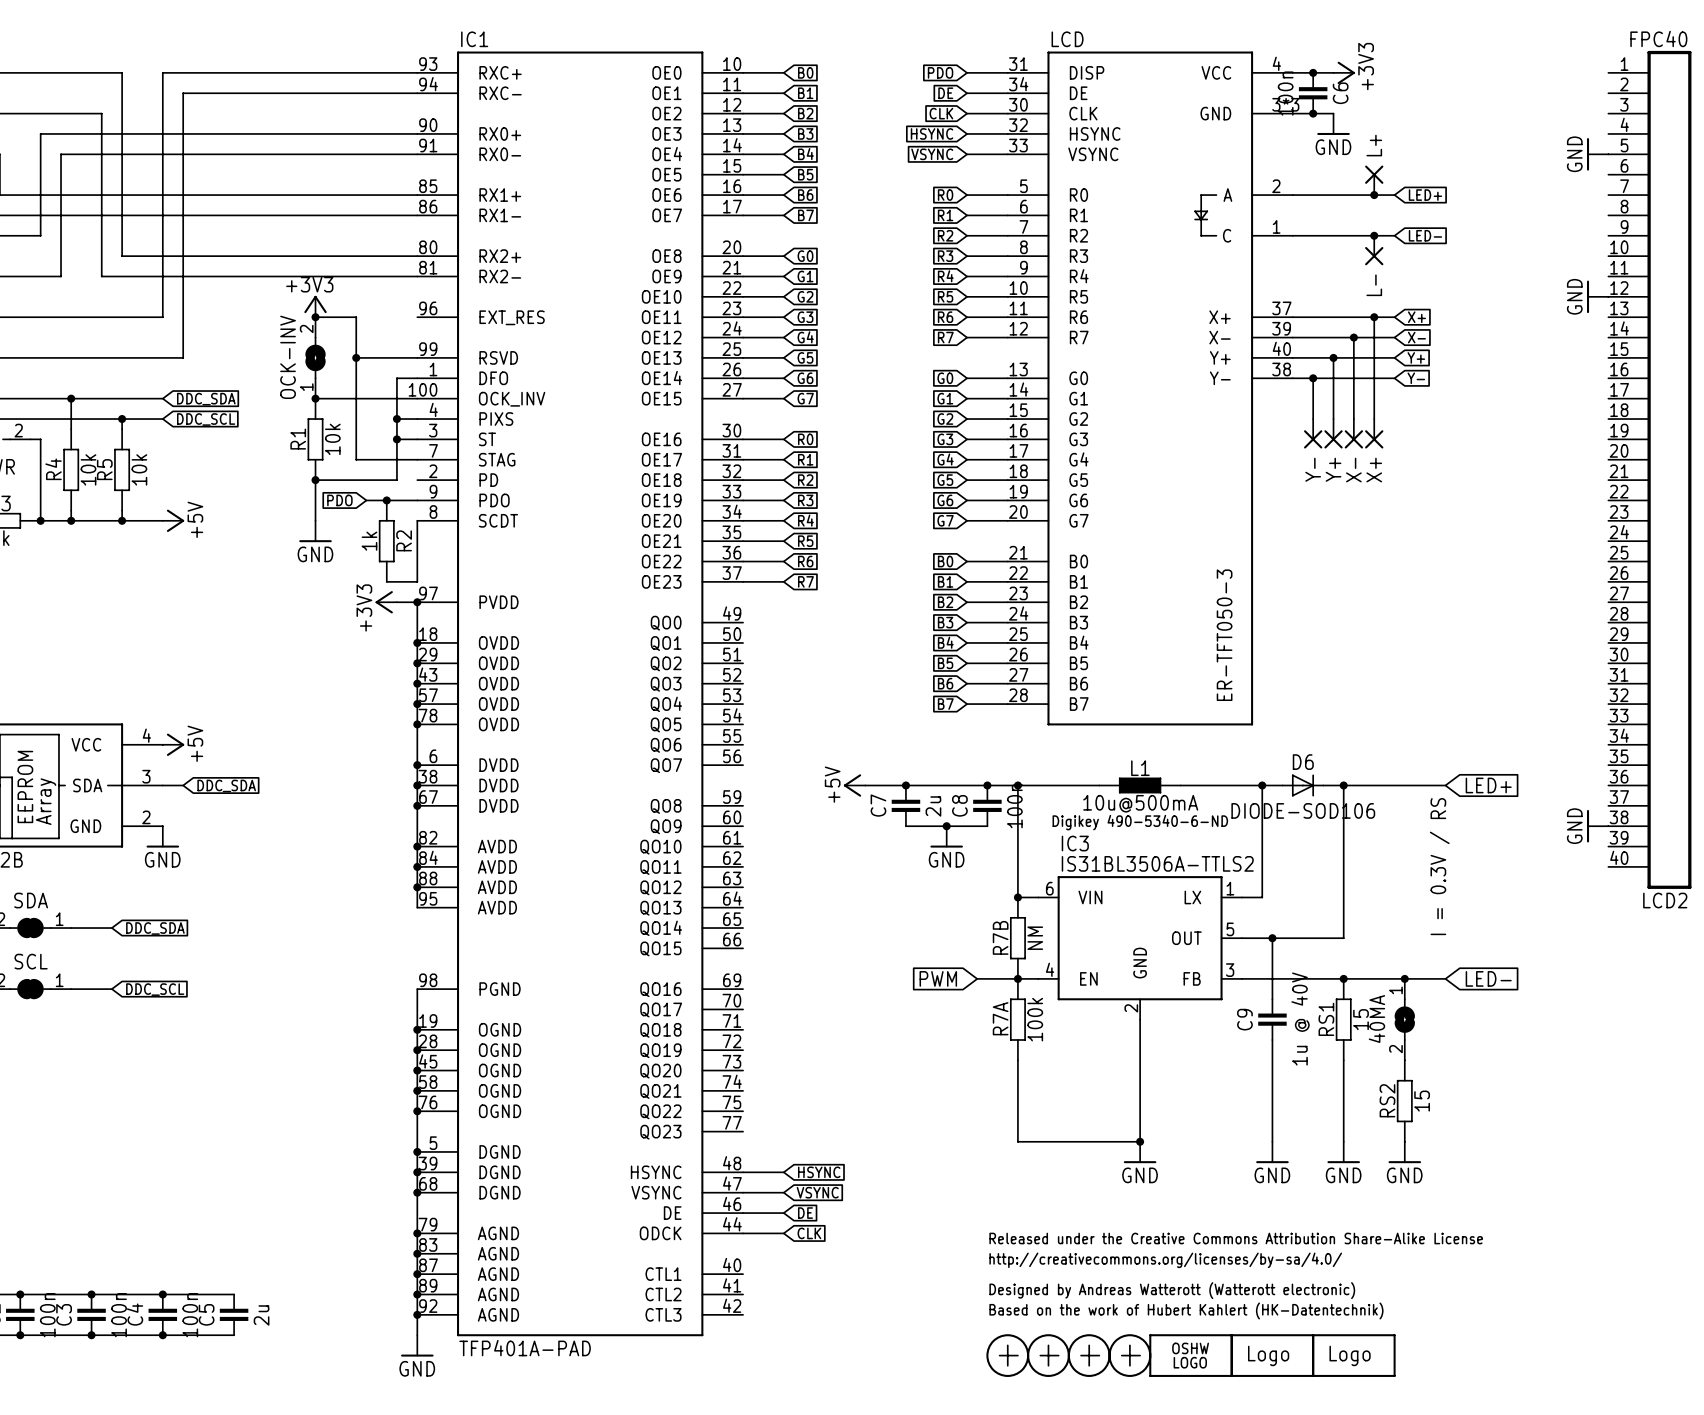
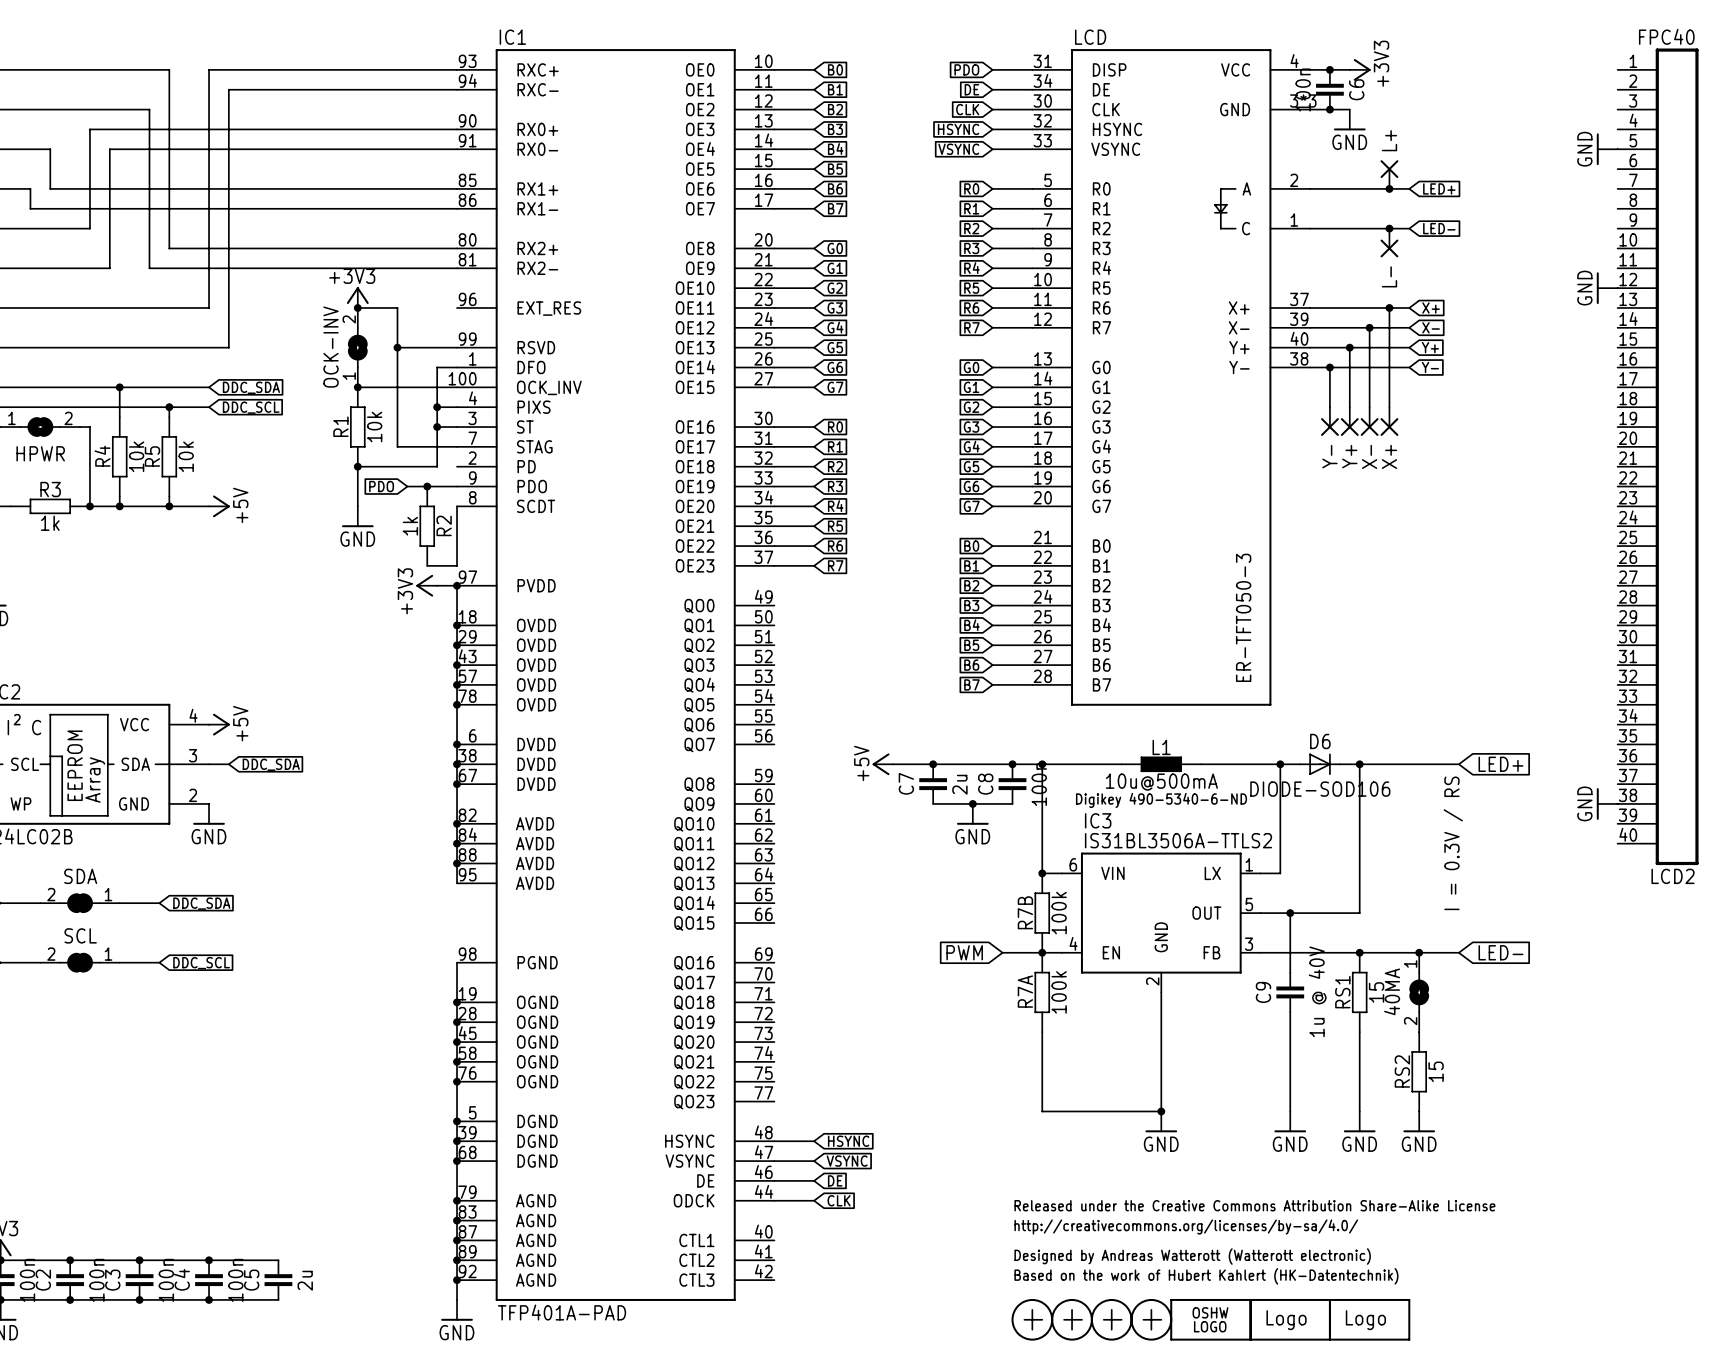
R7B value: NM (1035, 938) -> 100k (1059, 913)

